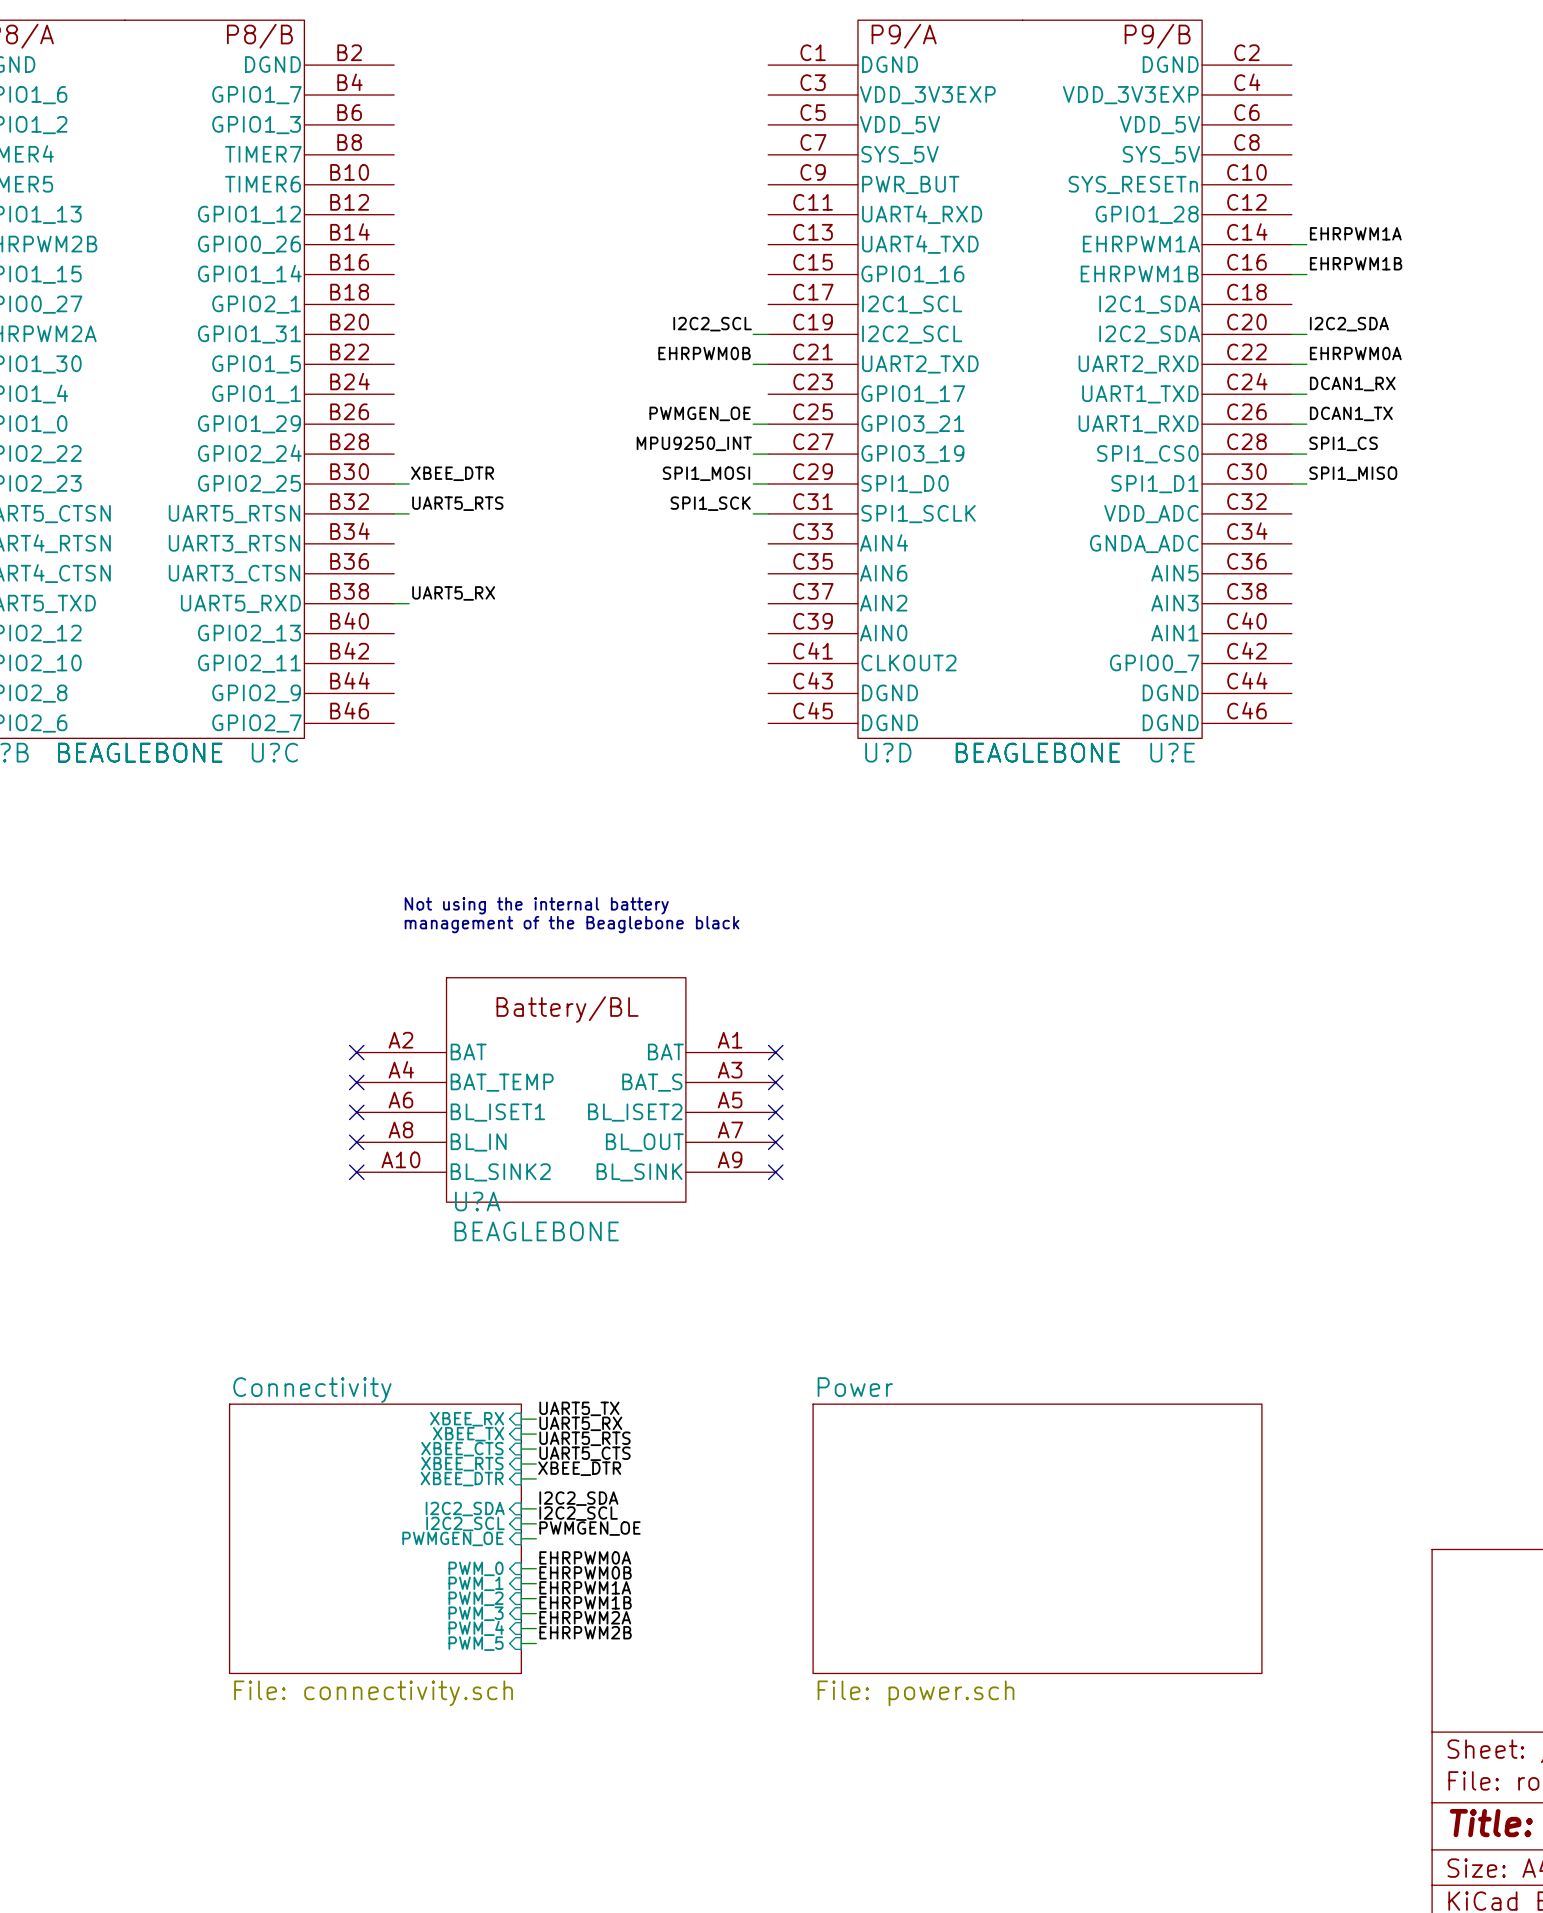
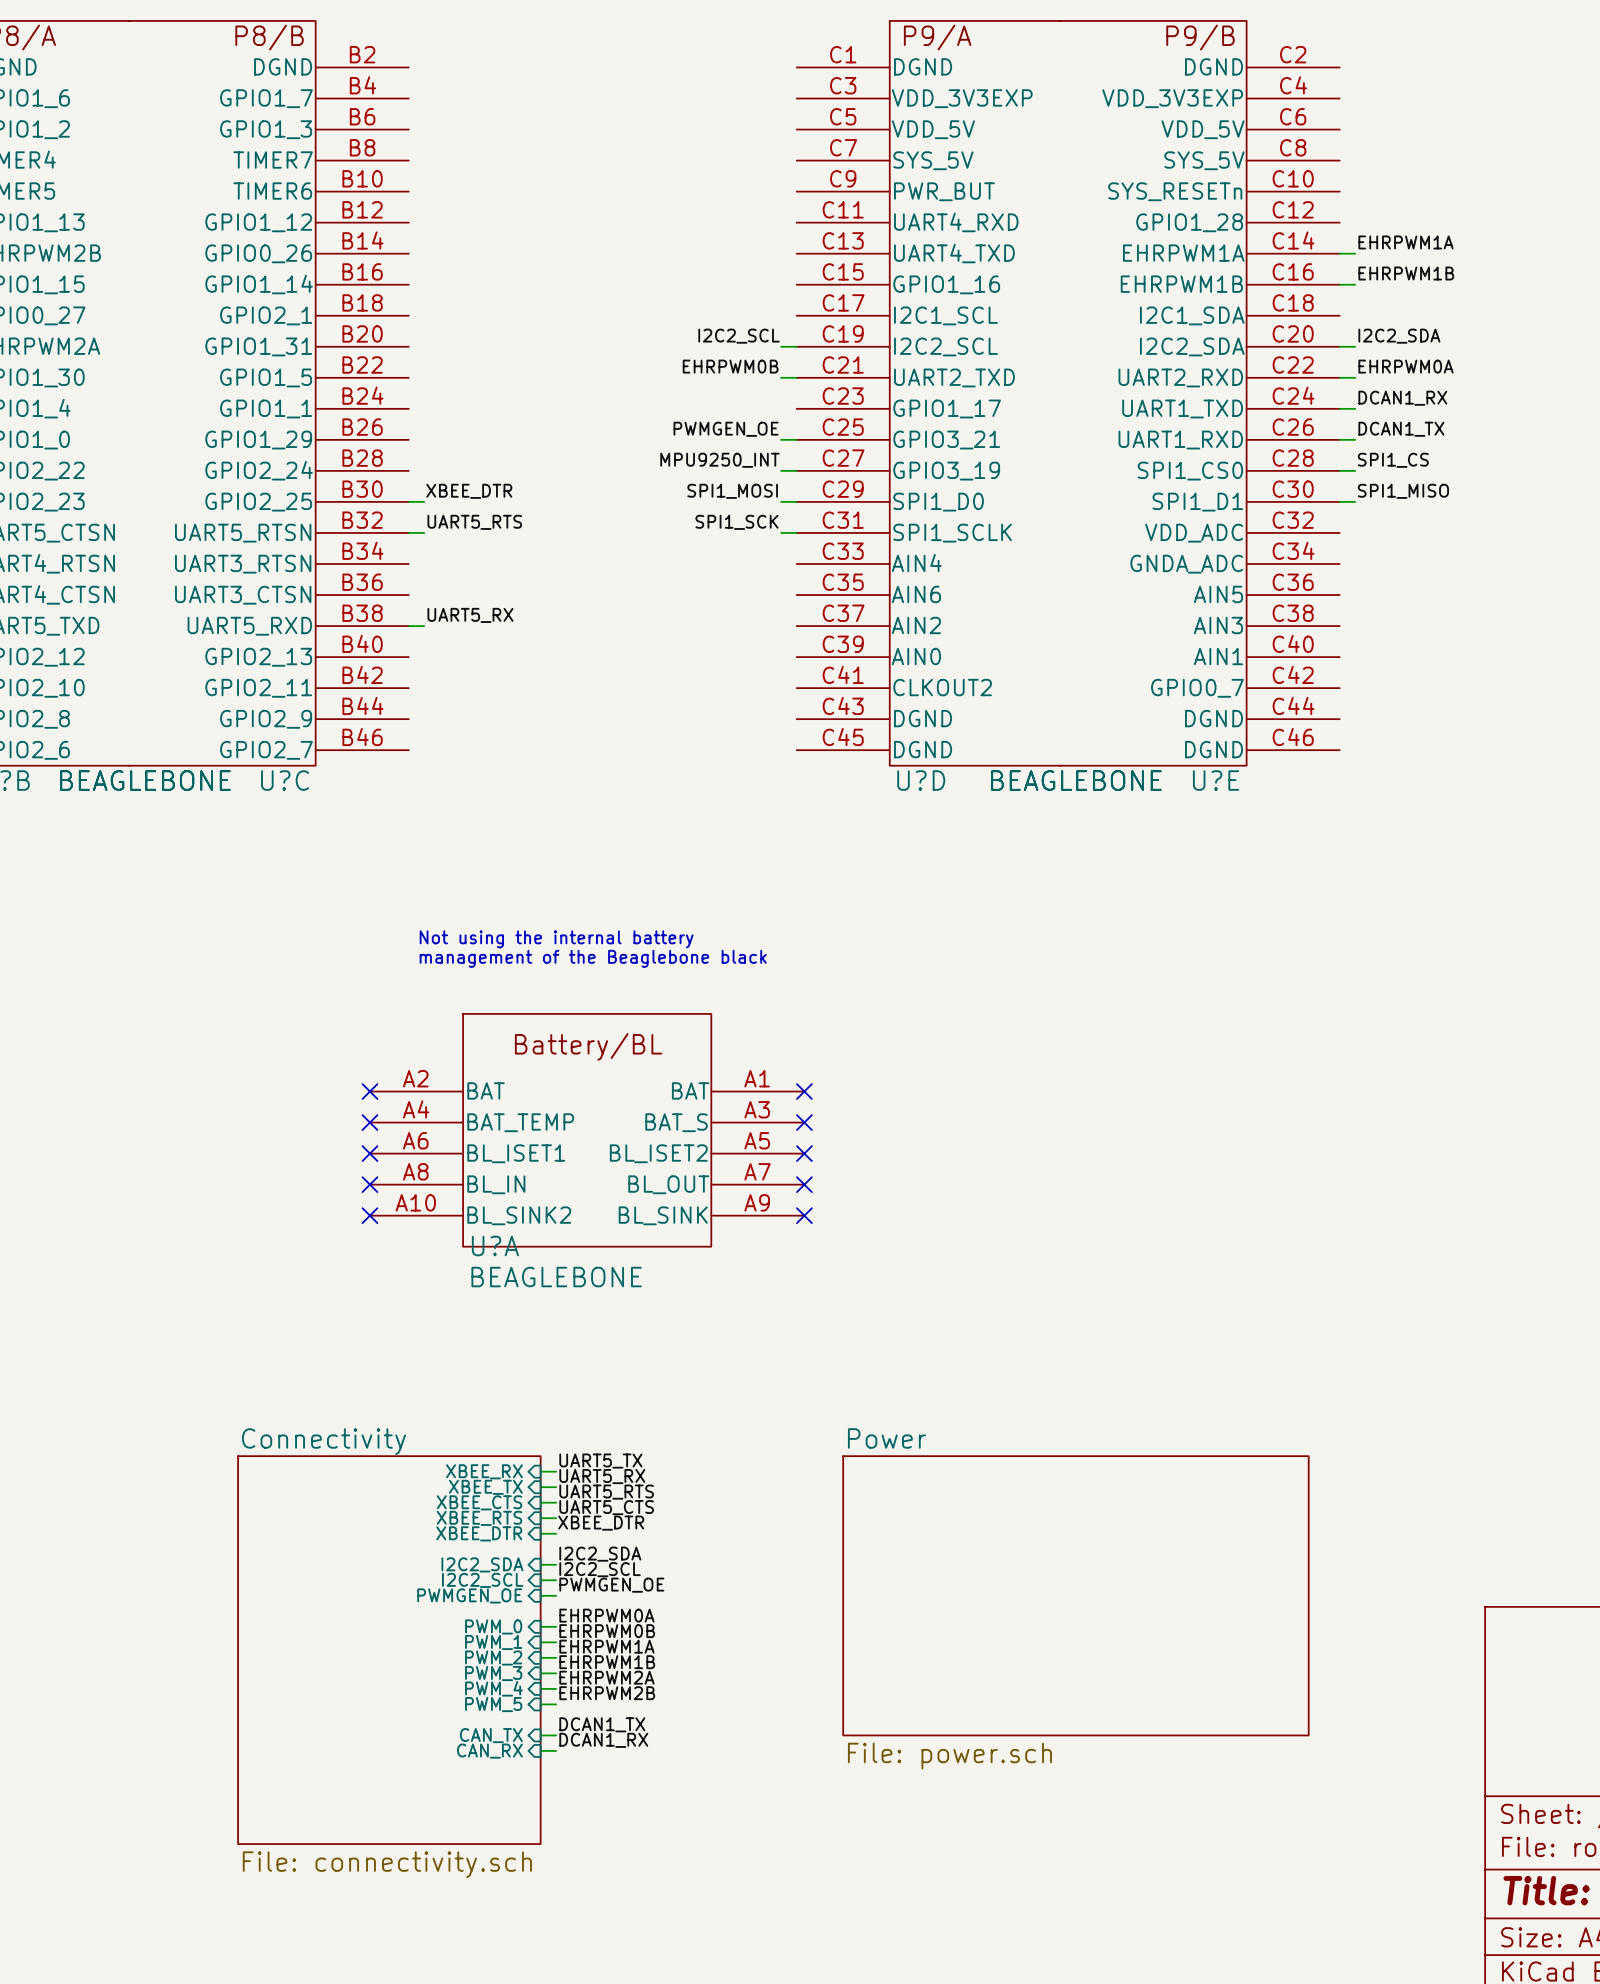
sheet Connectivity: File: connectivity.sch (375, 1538) -> none
sheet Connectivity: none -> File: connectivity.sch (389, 1650)
label: none -> DCAN1_TX (602, 1724)
sheet pin: none -> CAN_TX (491, 1735)
wire: none -> (540, 1735) (556, 1735)
label: none -> DCAN1_RX (603, 1740)
sheet pin: none -> CAN_RX (489, 1751)
wire: none -> (540, 1750) (556, 1750)

